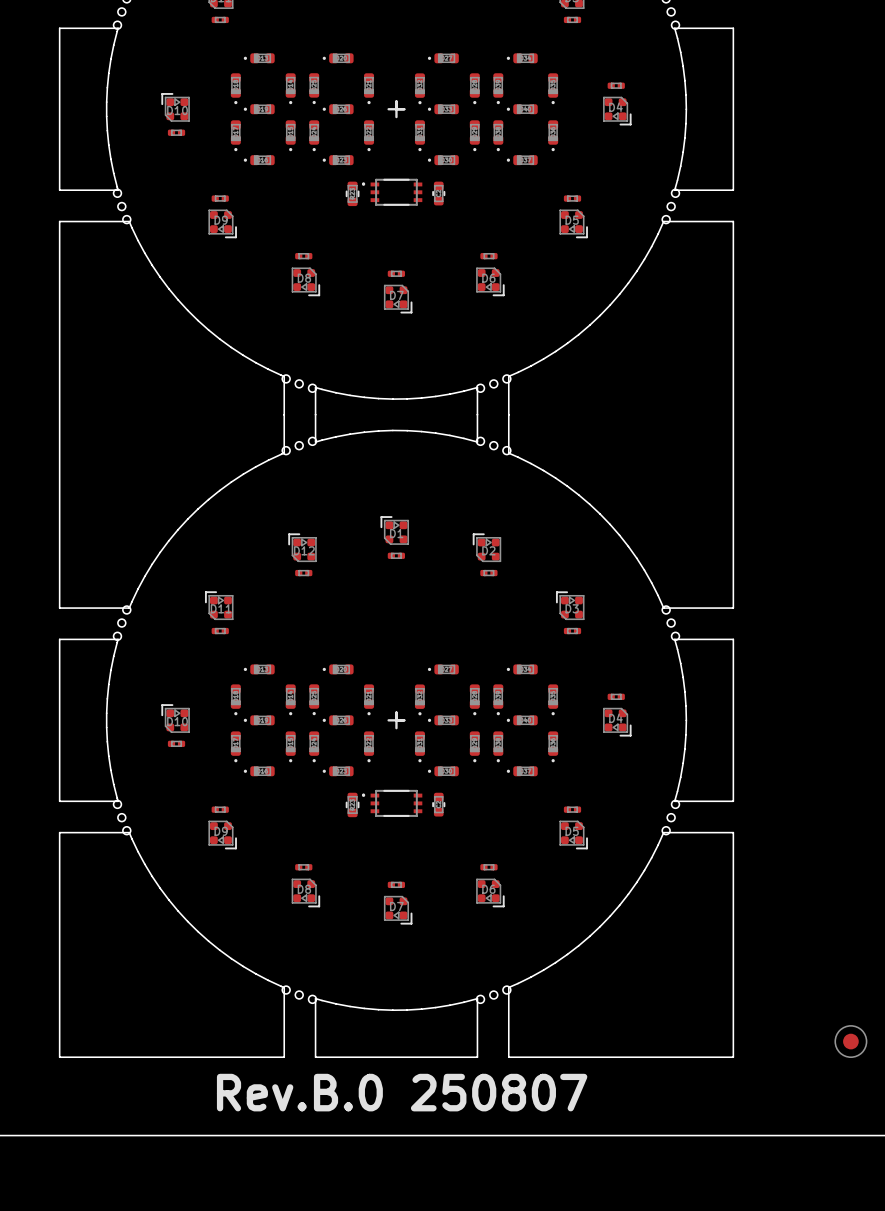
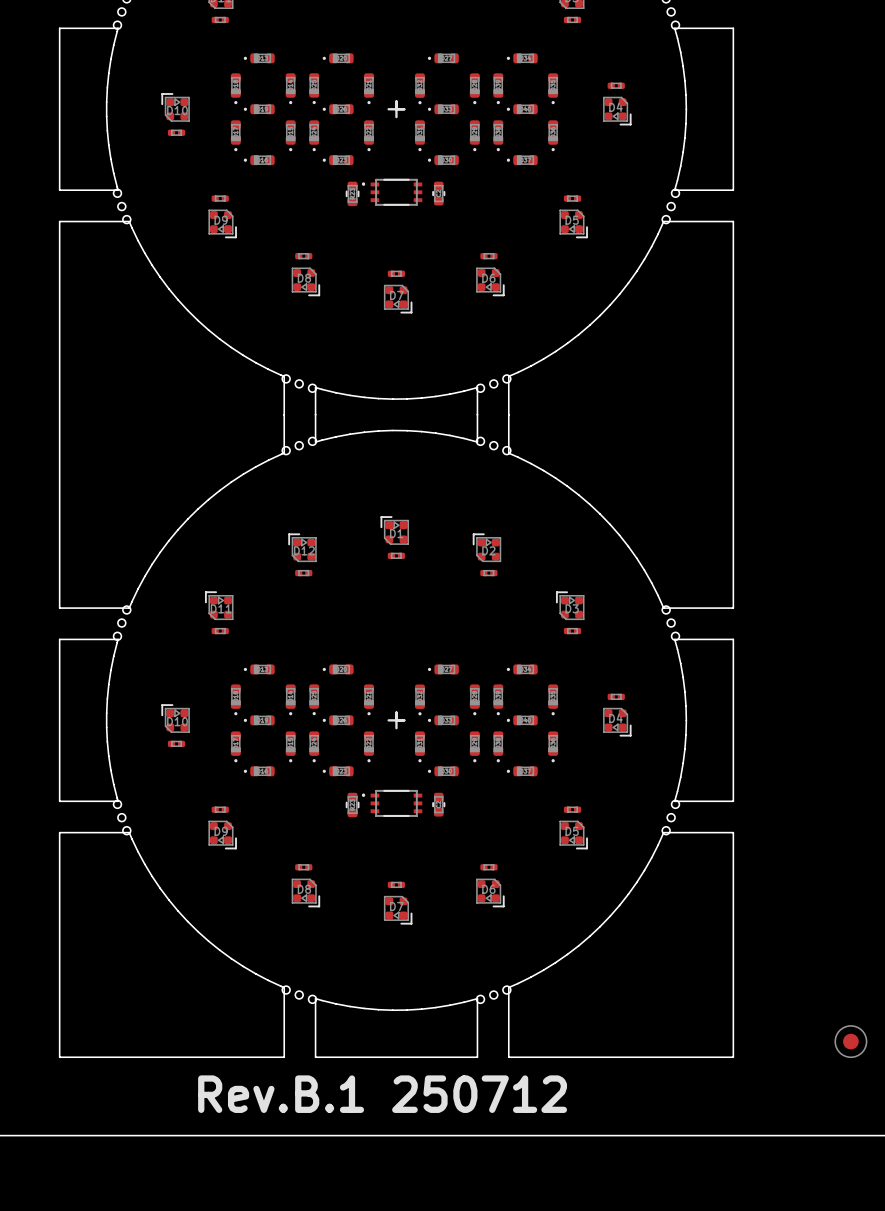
text: Rev.B.0 250807 (402, 1092) -> Rev.B.1 250712 (382, 1094)

